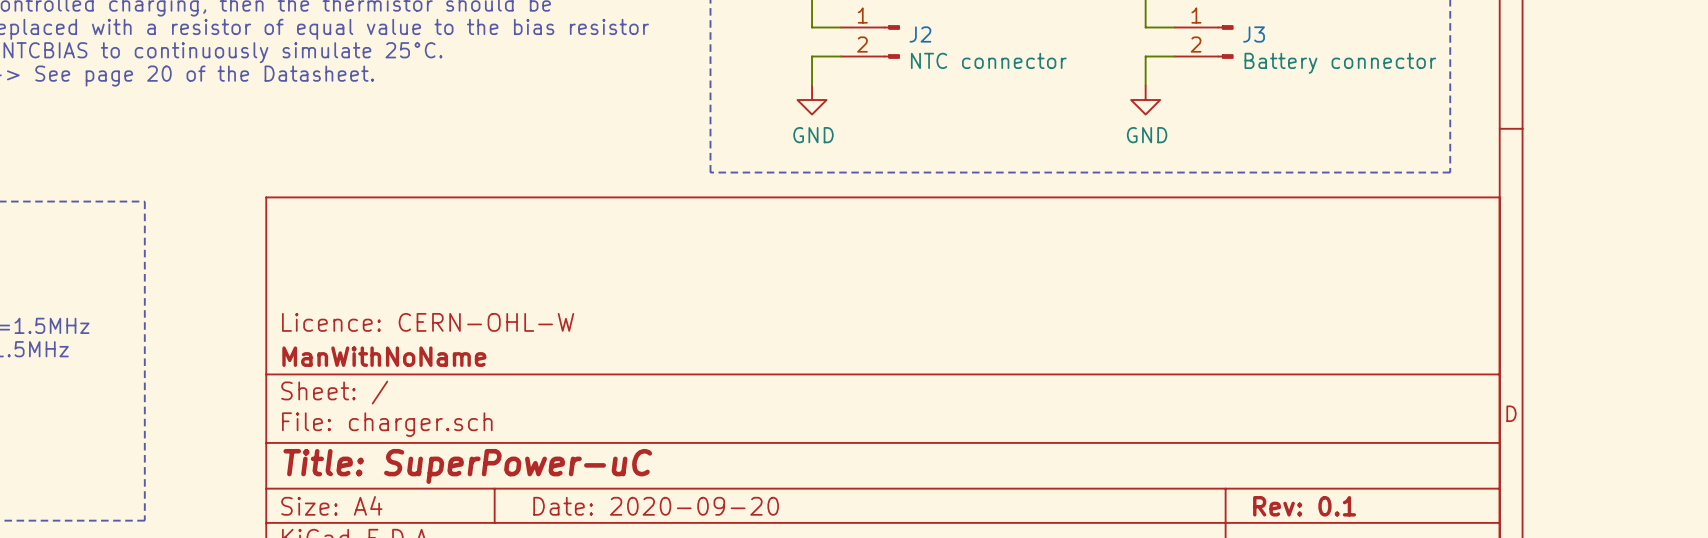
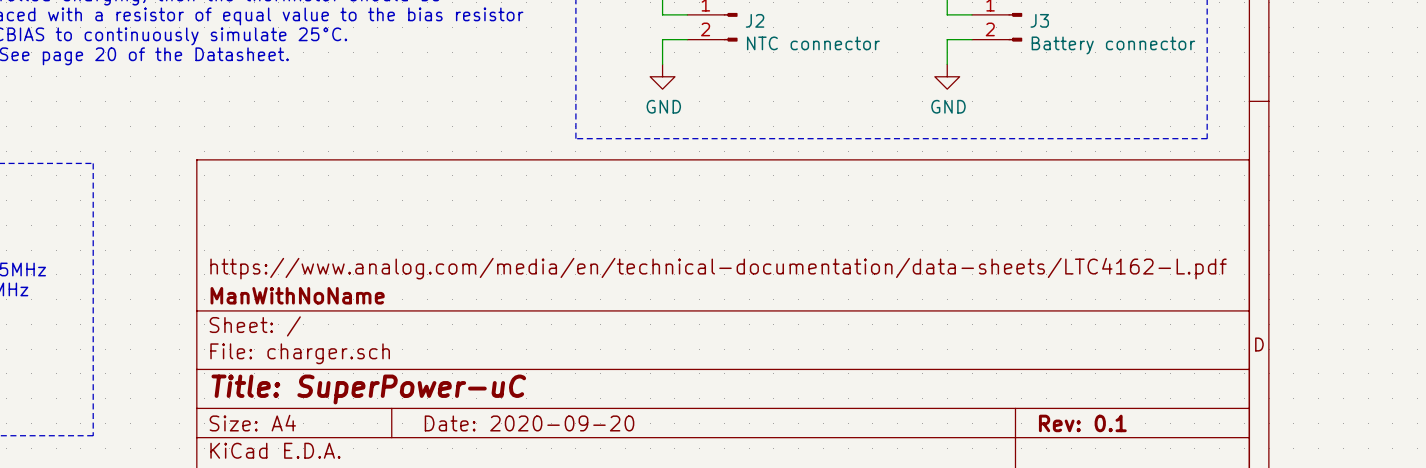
title block: Licence: CERN-OHL-W (428, 322) -> https://www.analog.com/media/en/technical-documentation/data-sheets/LTC4162-L.pdf (718, 268)

